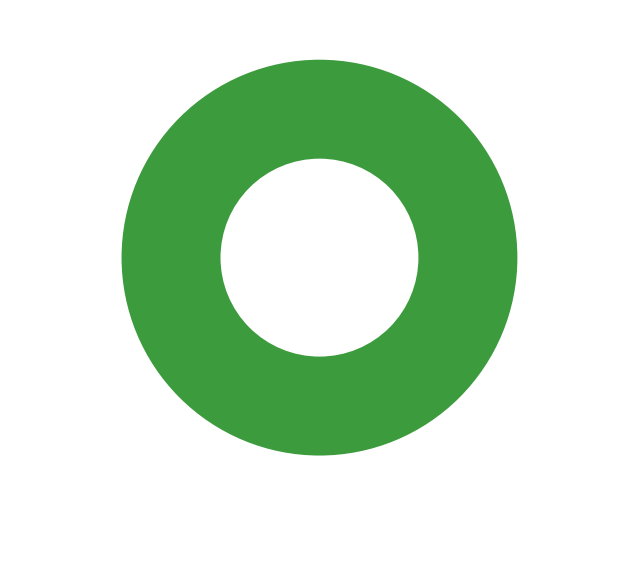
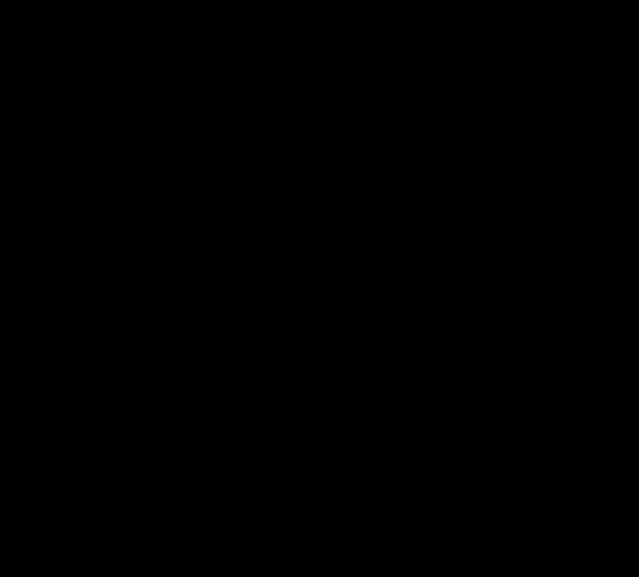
part: (319, 257) -> none

